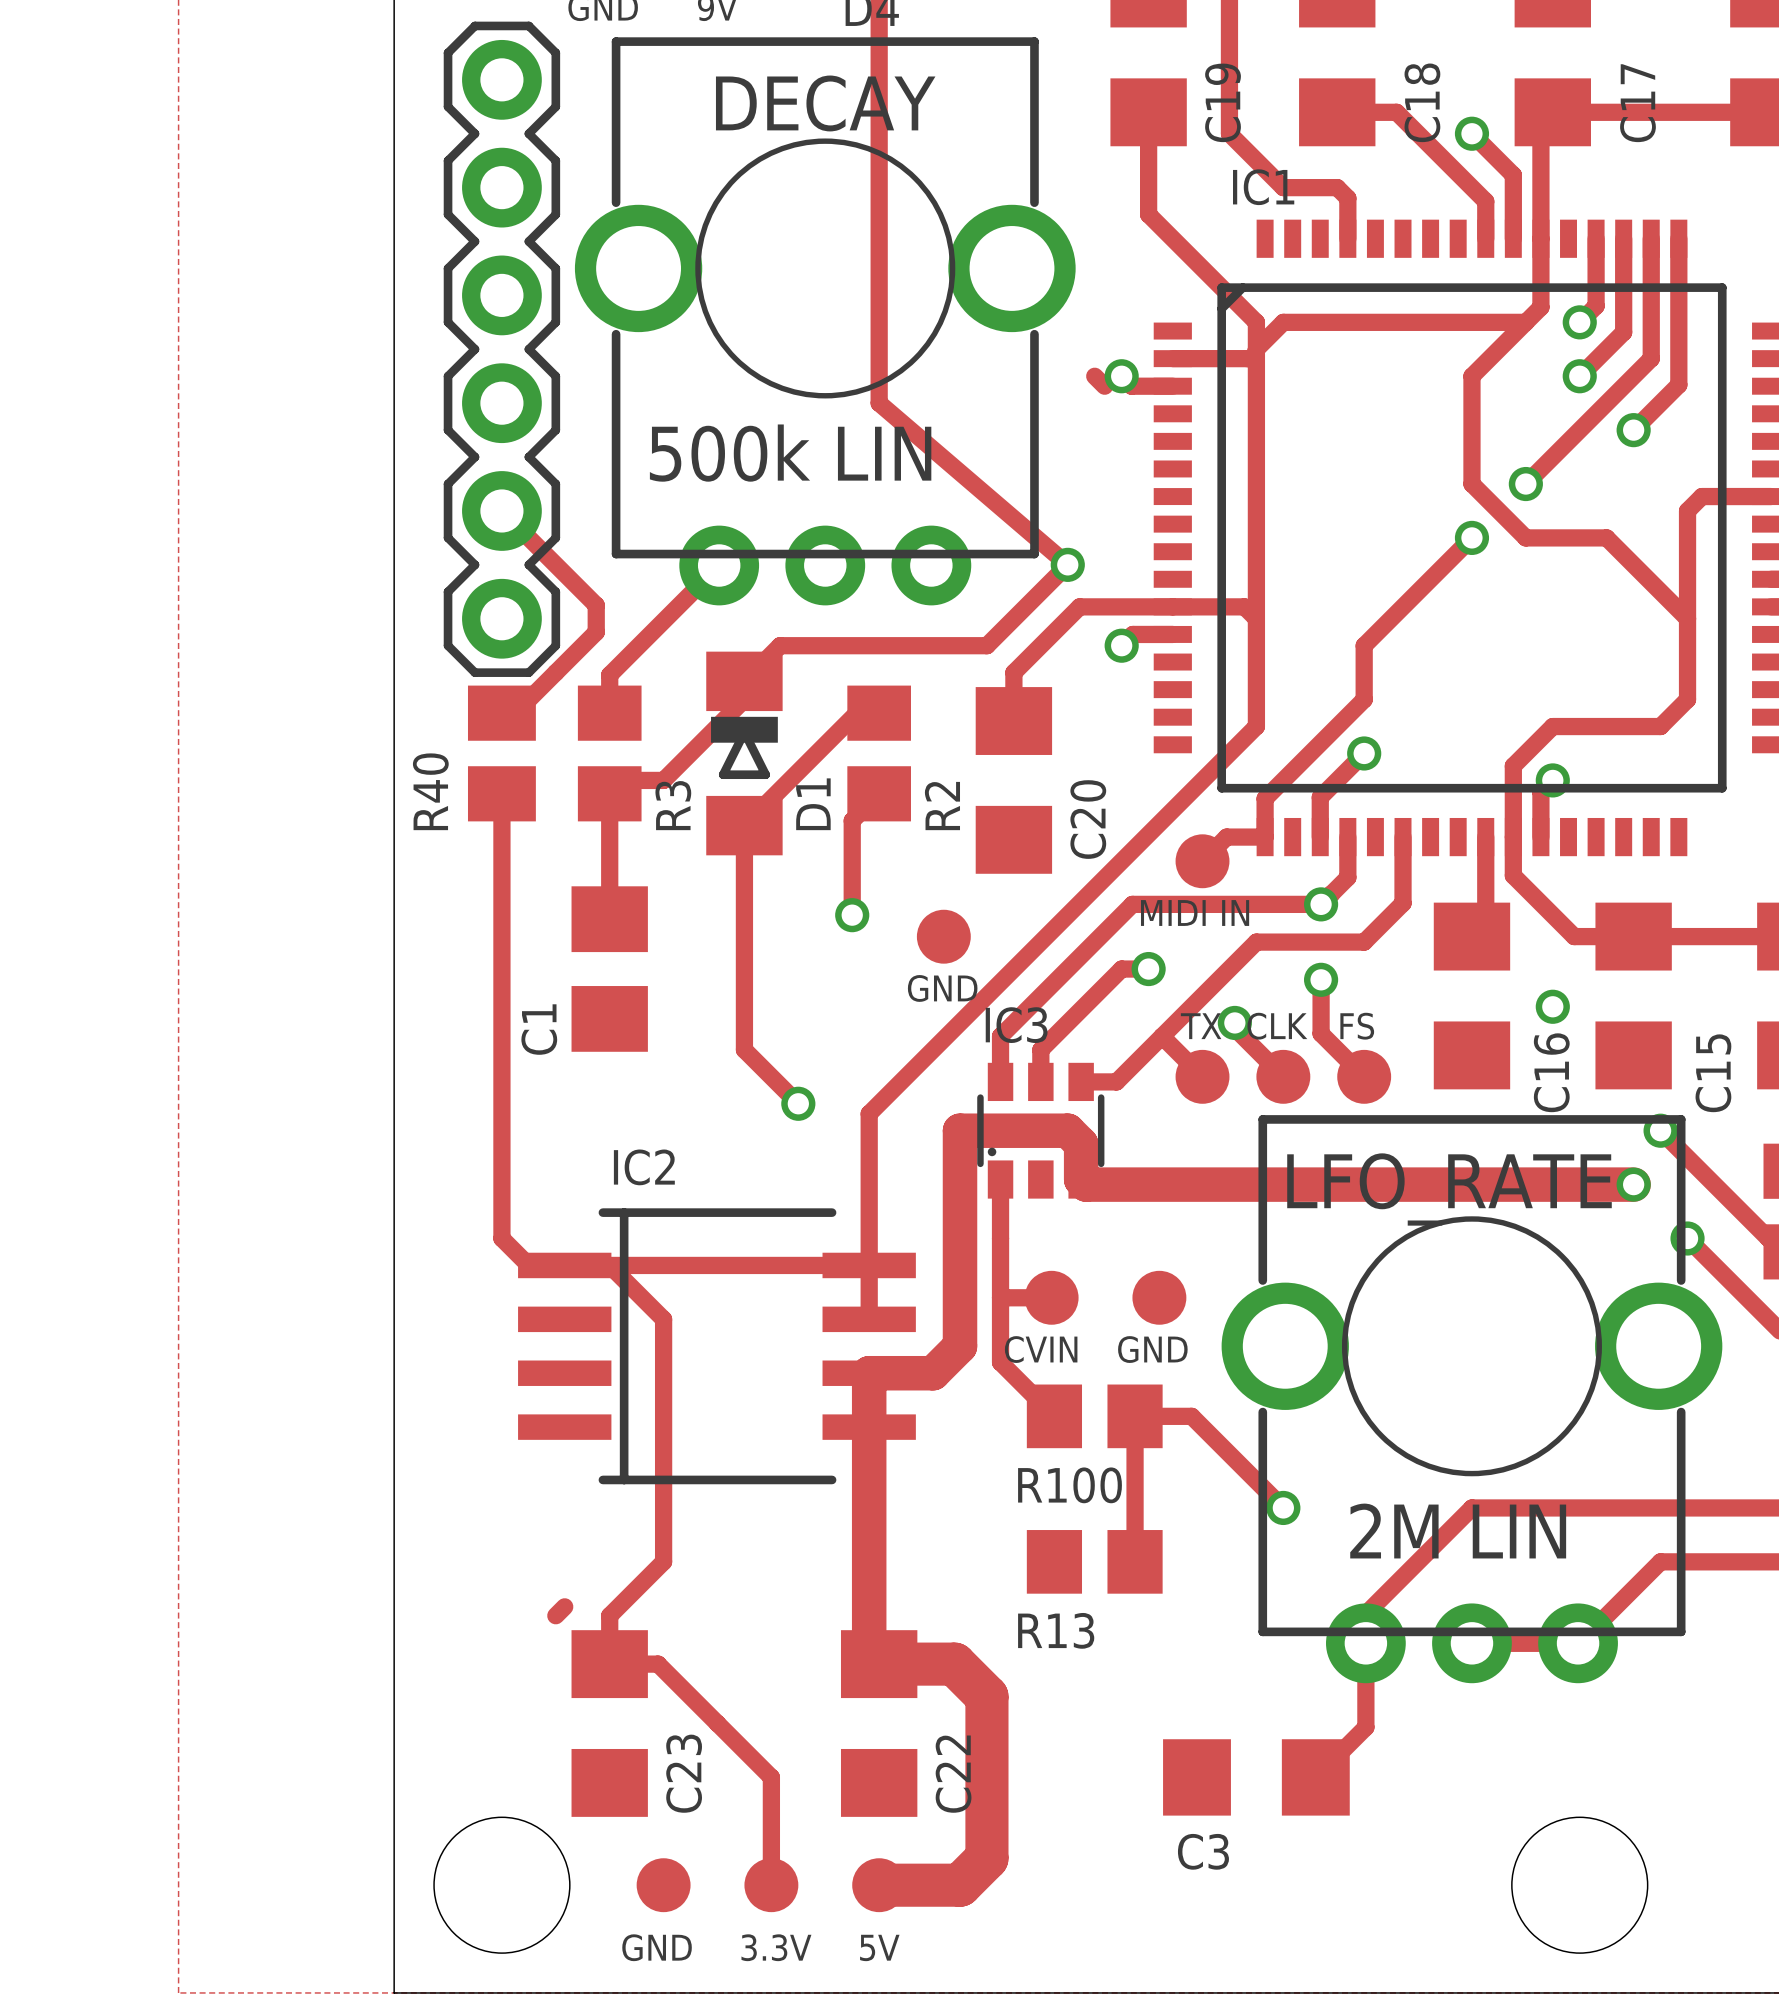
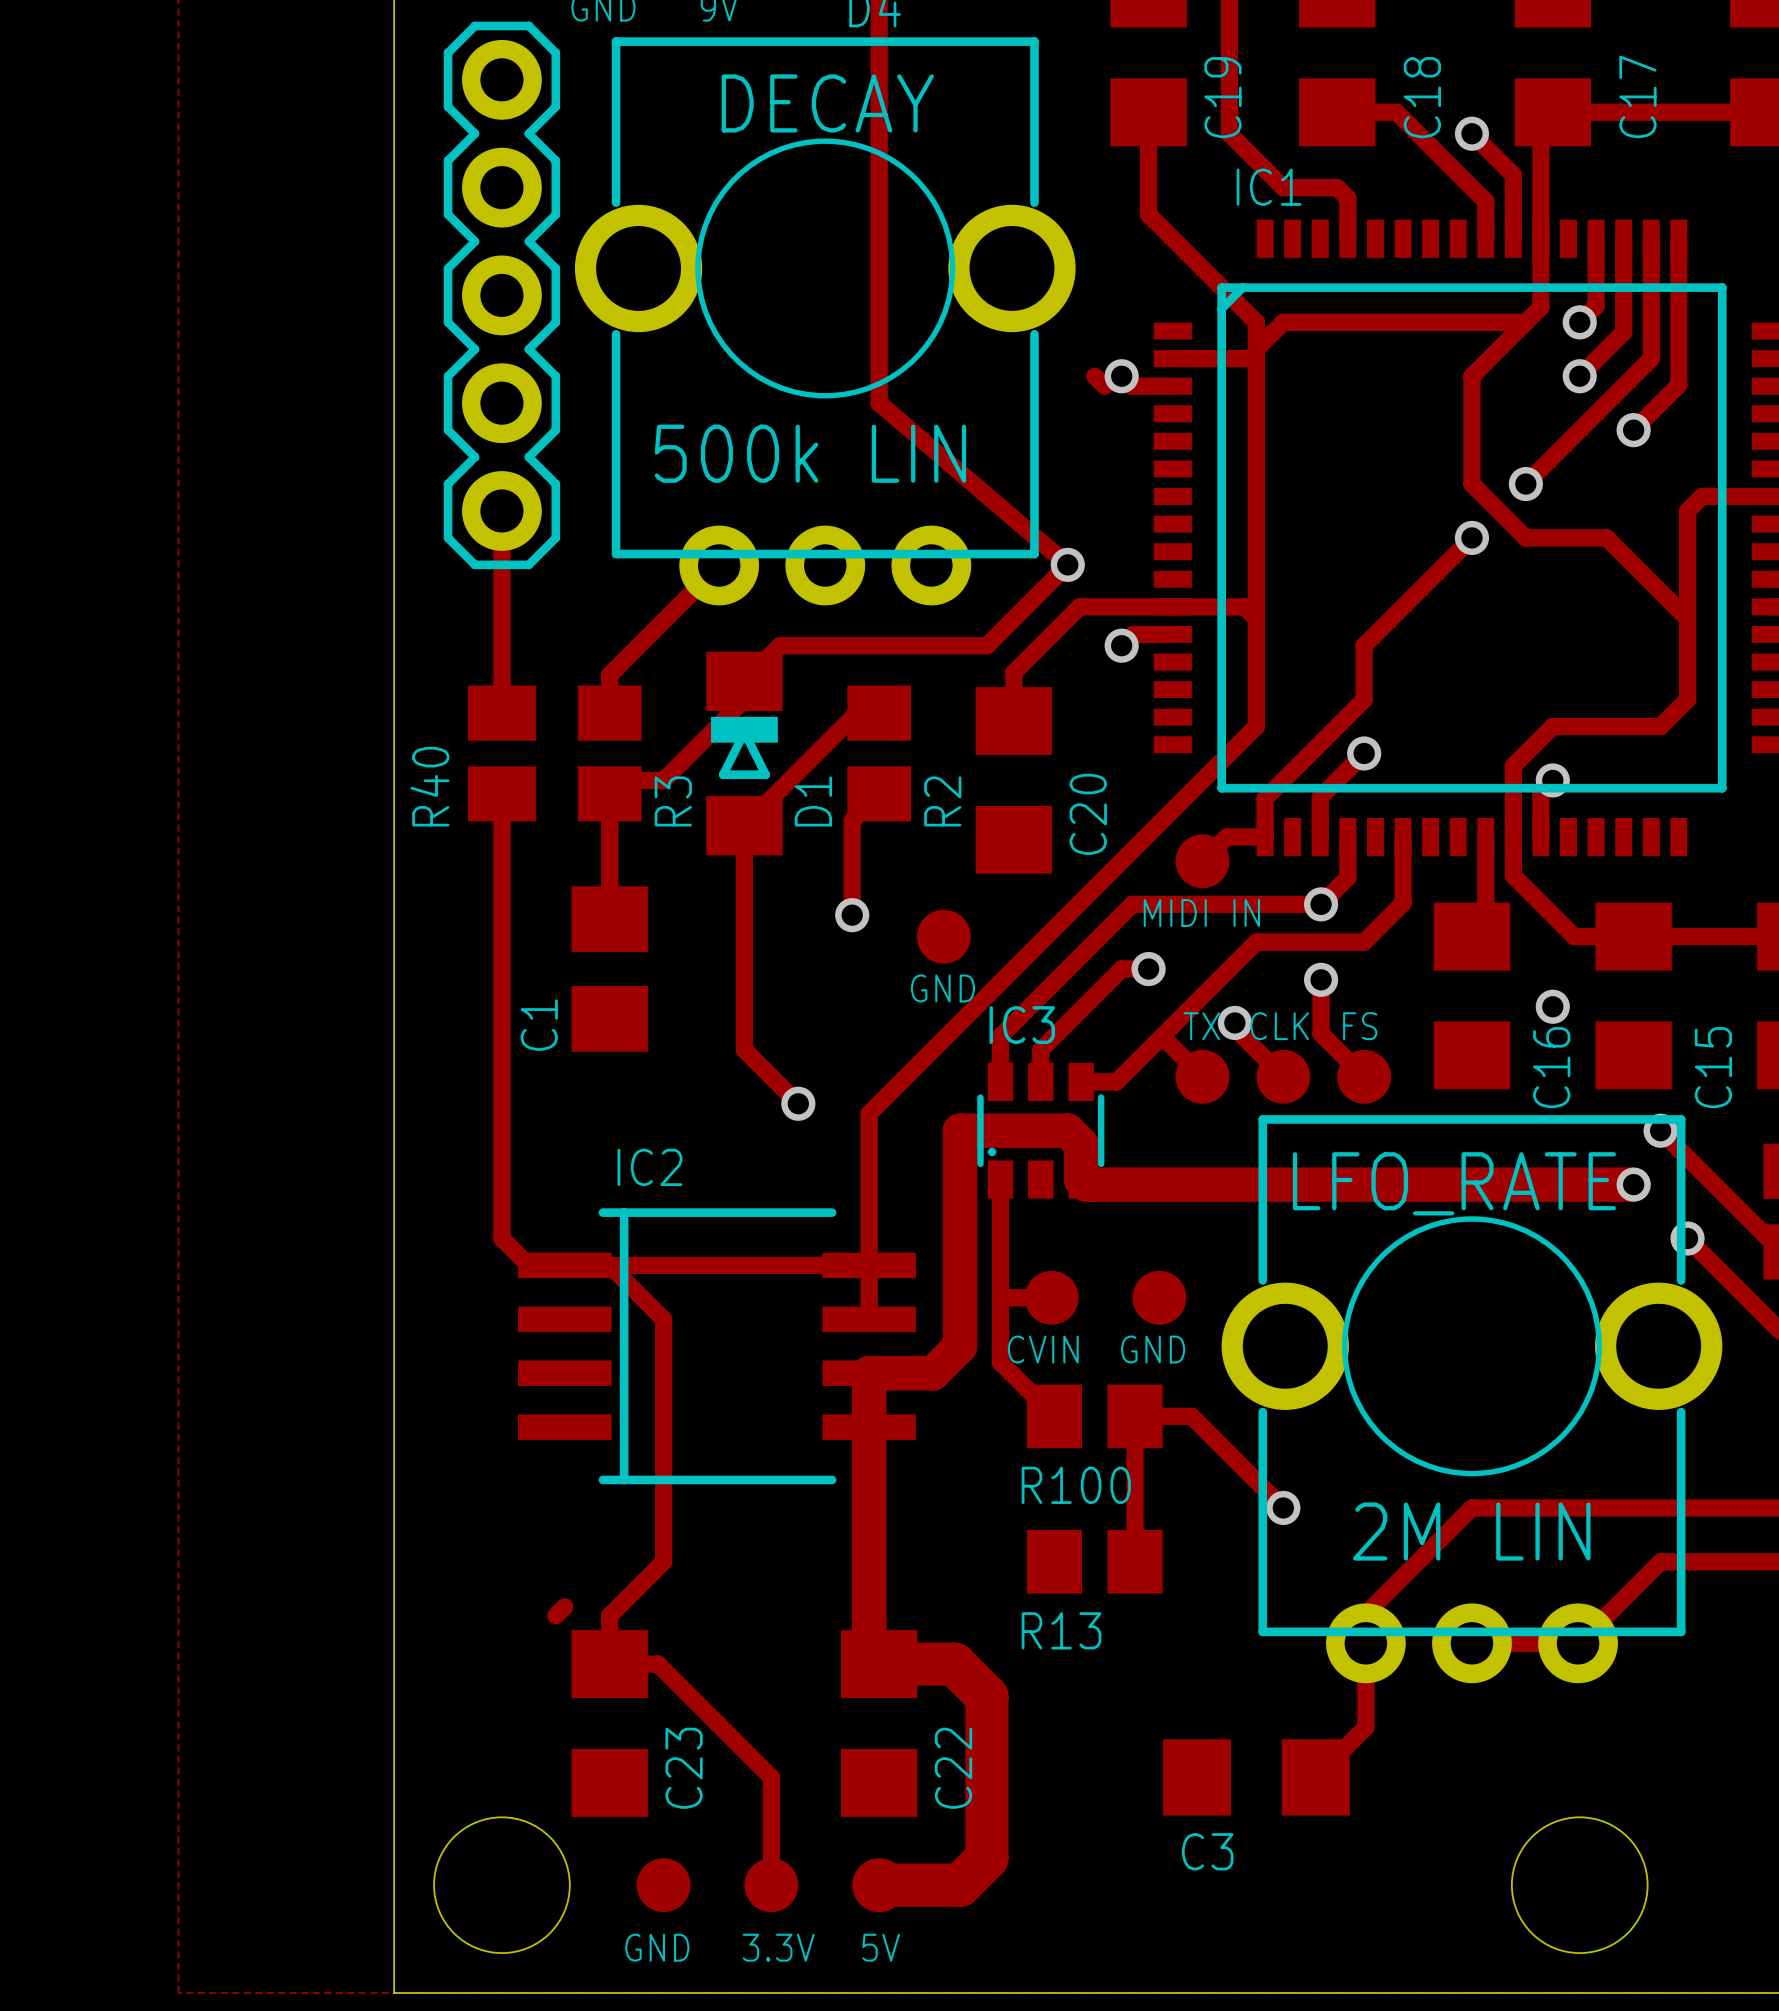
part: none -> (501, 295)
part: (501, 349) -> none
track: (501, 510) (596, 605) (596, 632) (515, 713) (501, 713) -> (501, 510) (501, 713)

